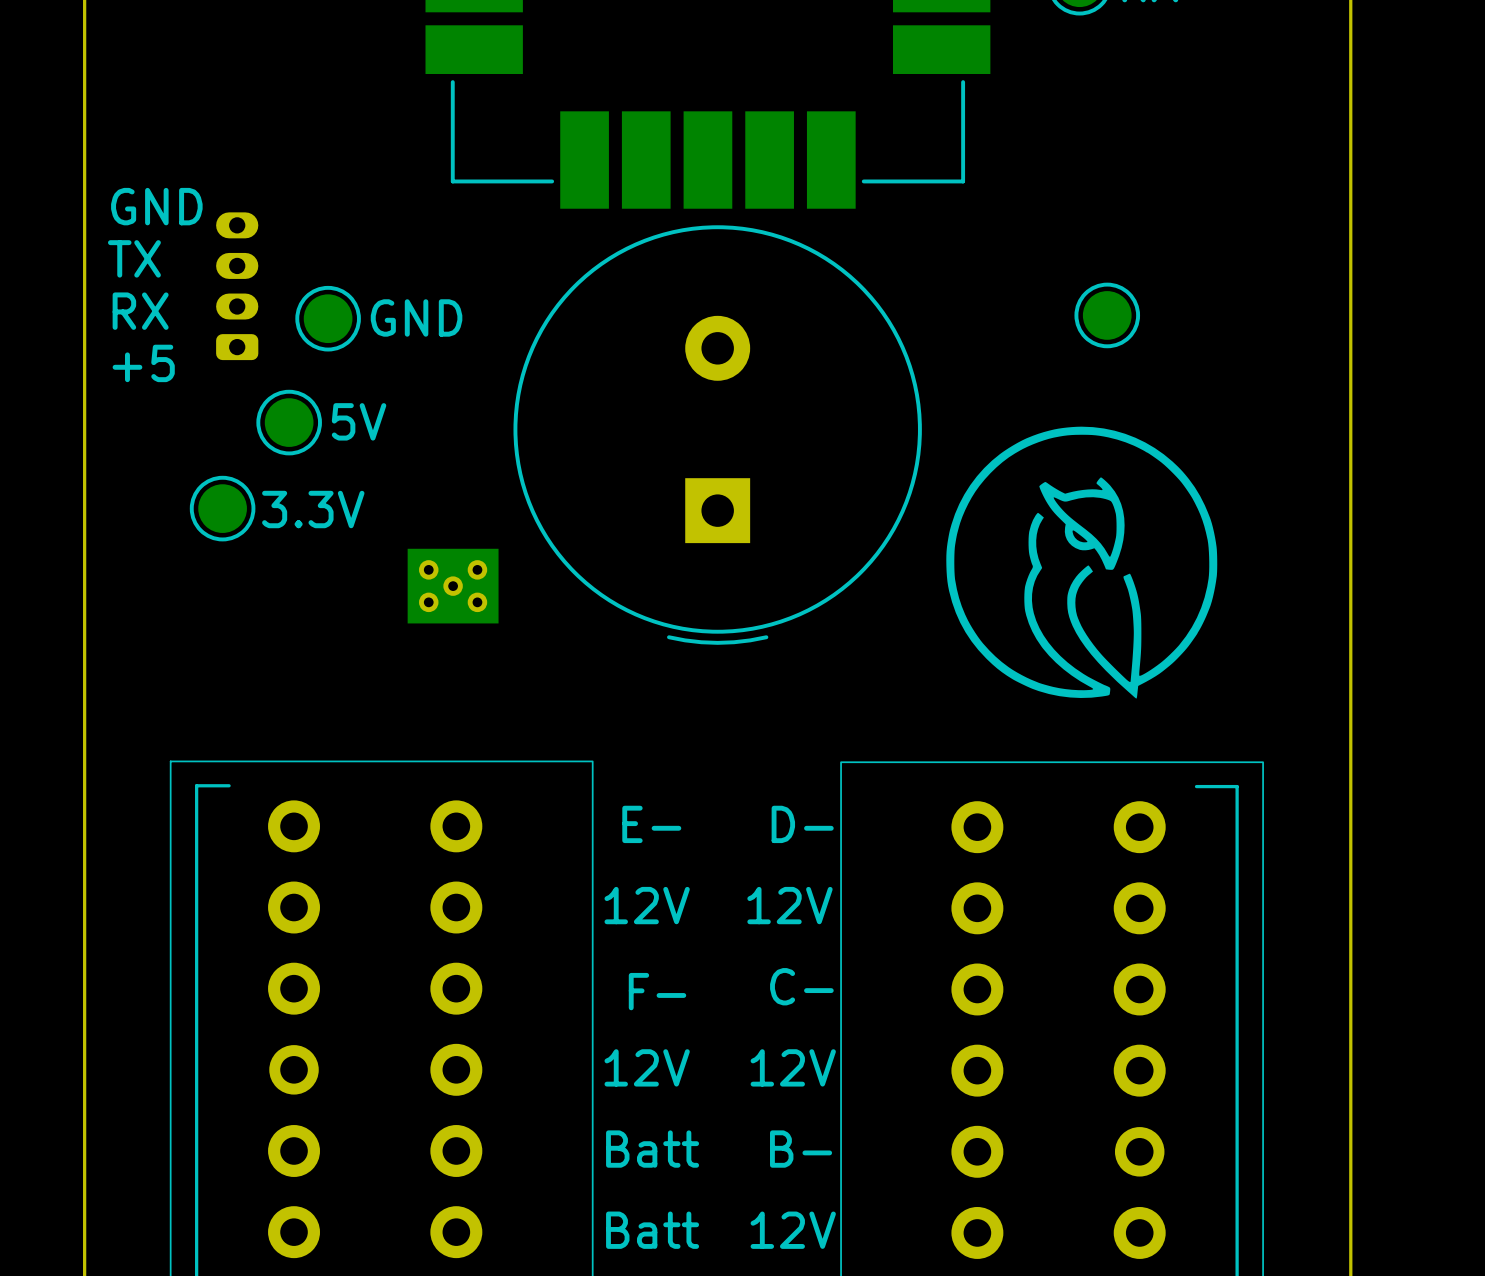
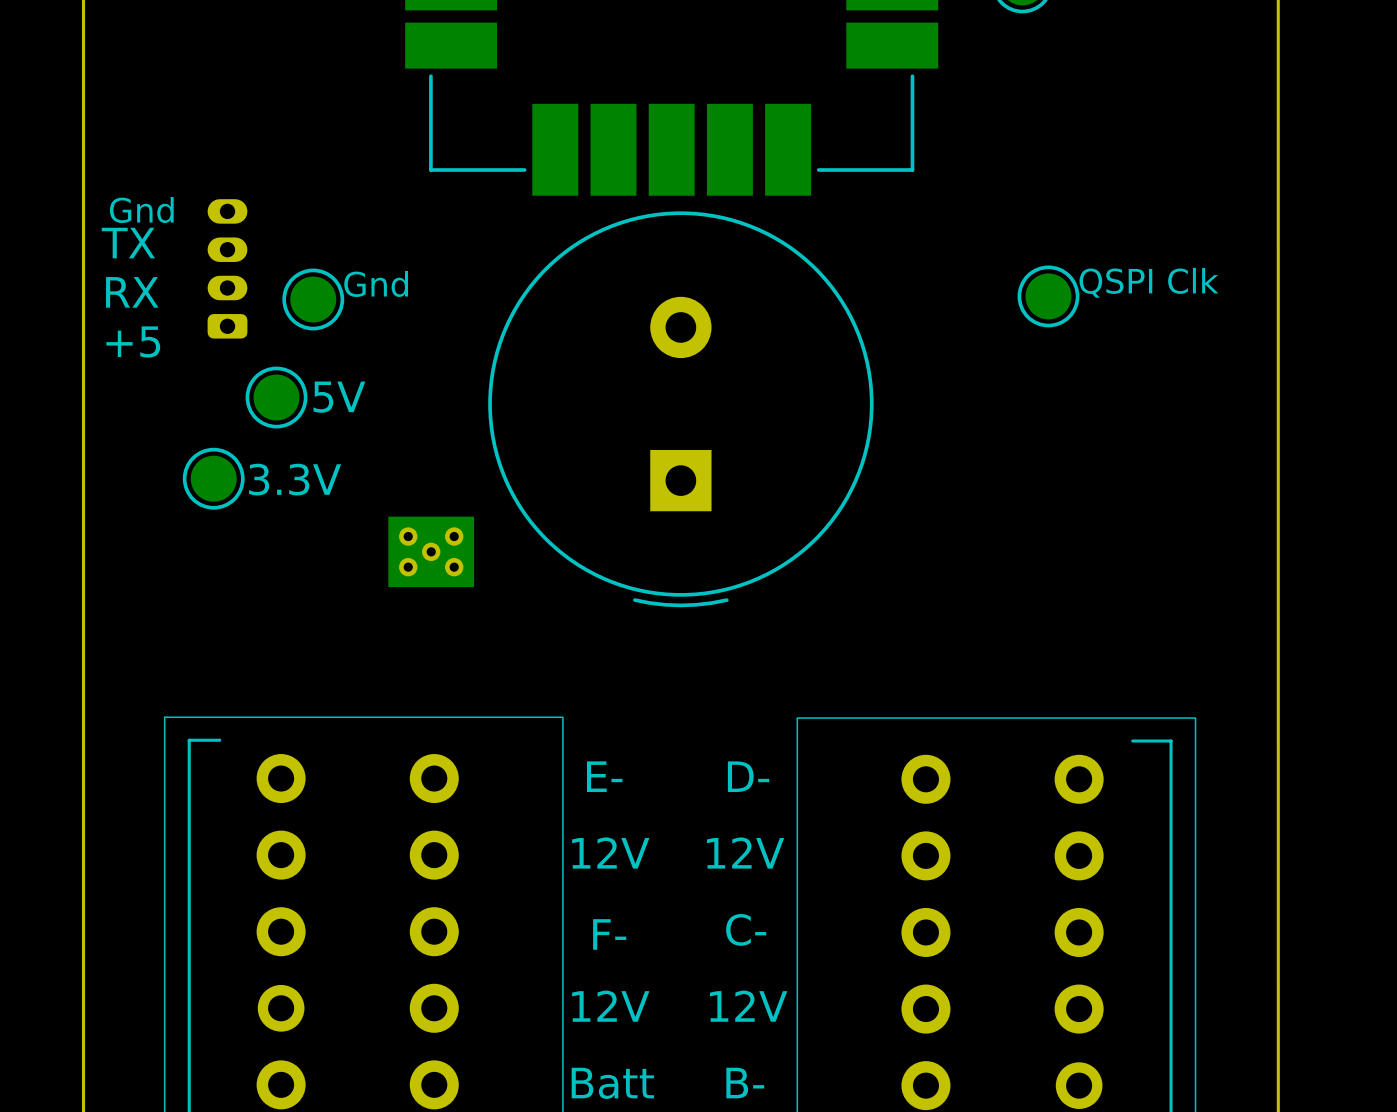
text: GND (156, 206) -> Gnd (141, 210)
text: none -> QSPI Clk (1148, 282)
text: GND (416, 317) -> Gnd (376, 283)
drawing: [946, 426, 1218, 699] -> none

